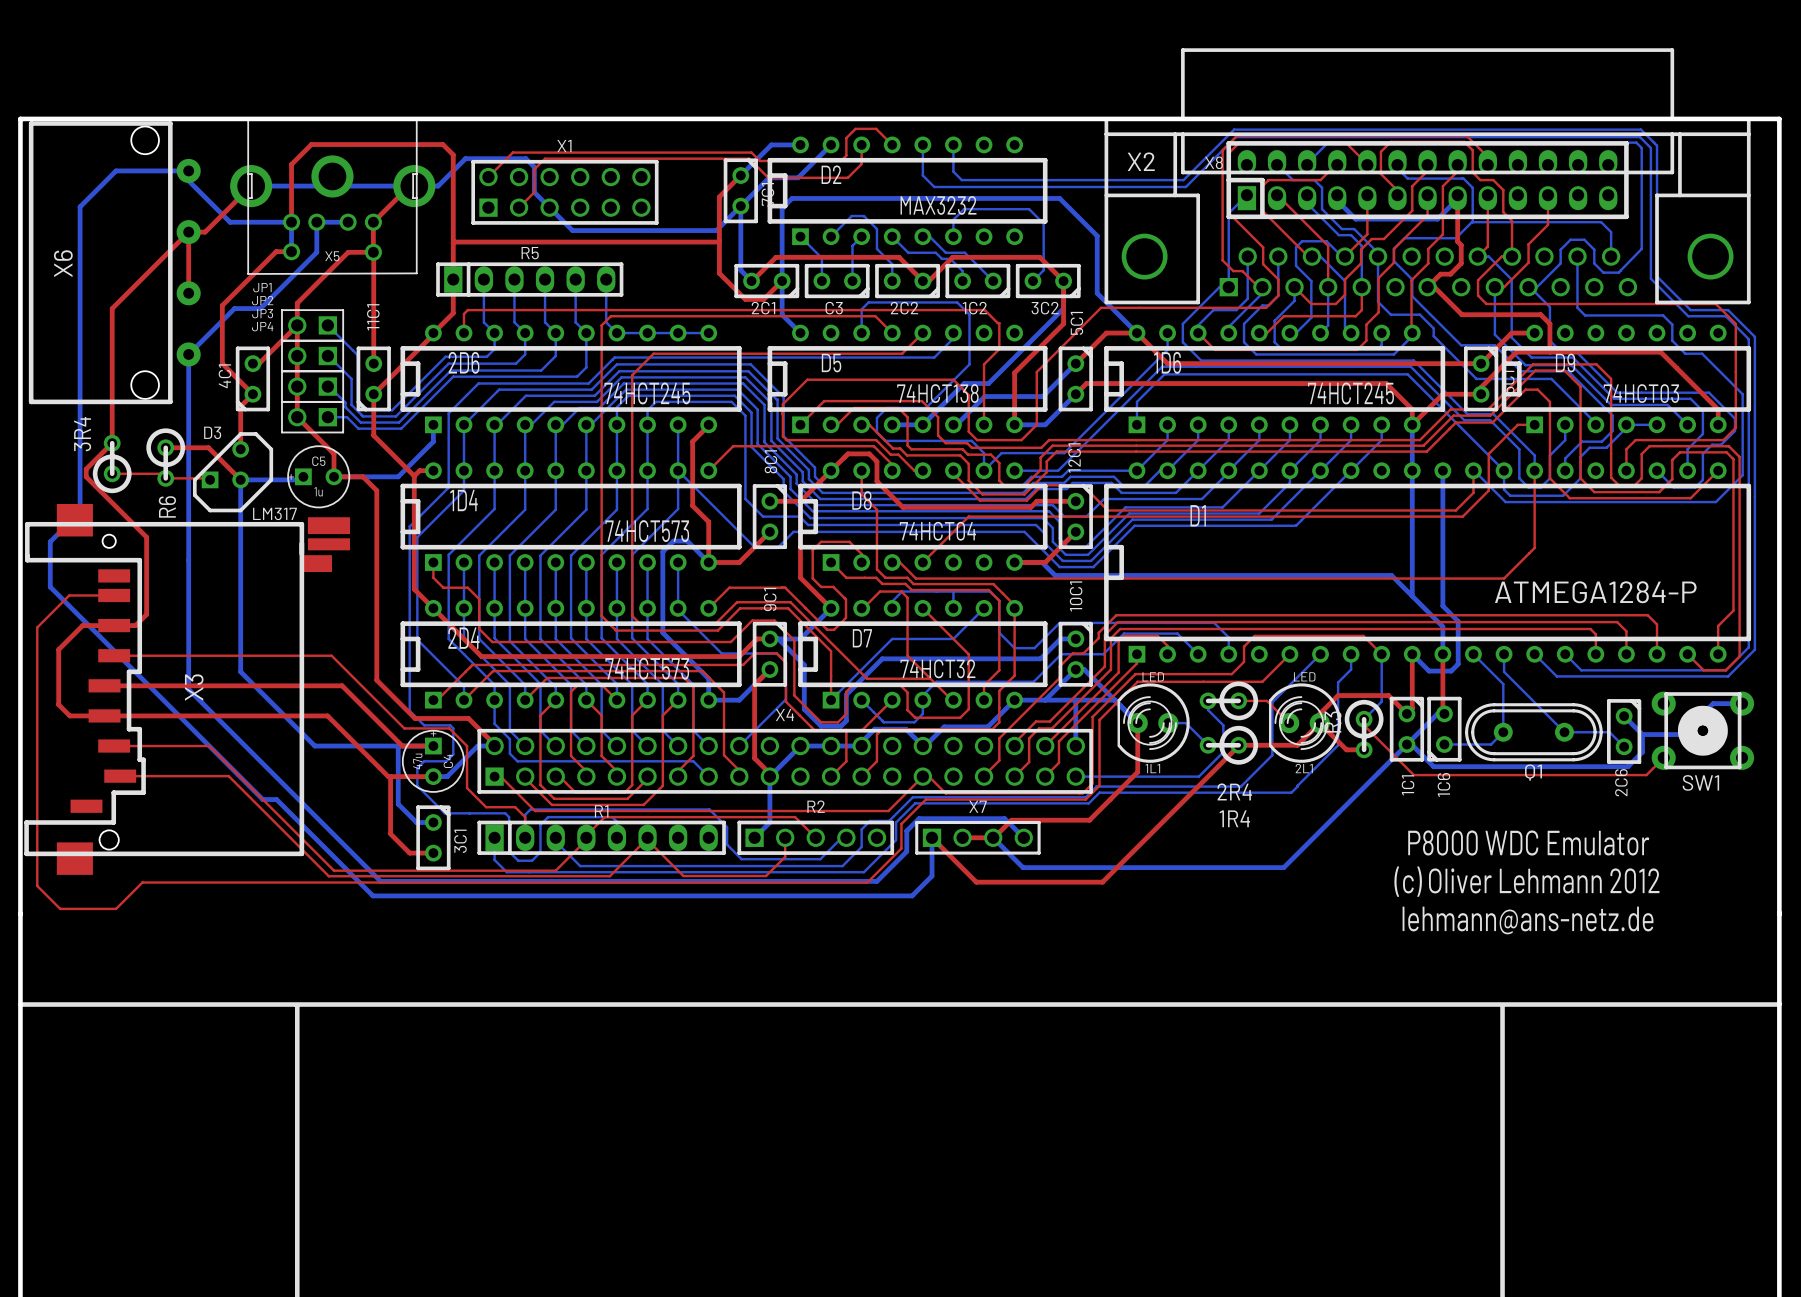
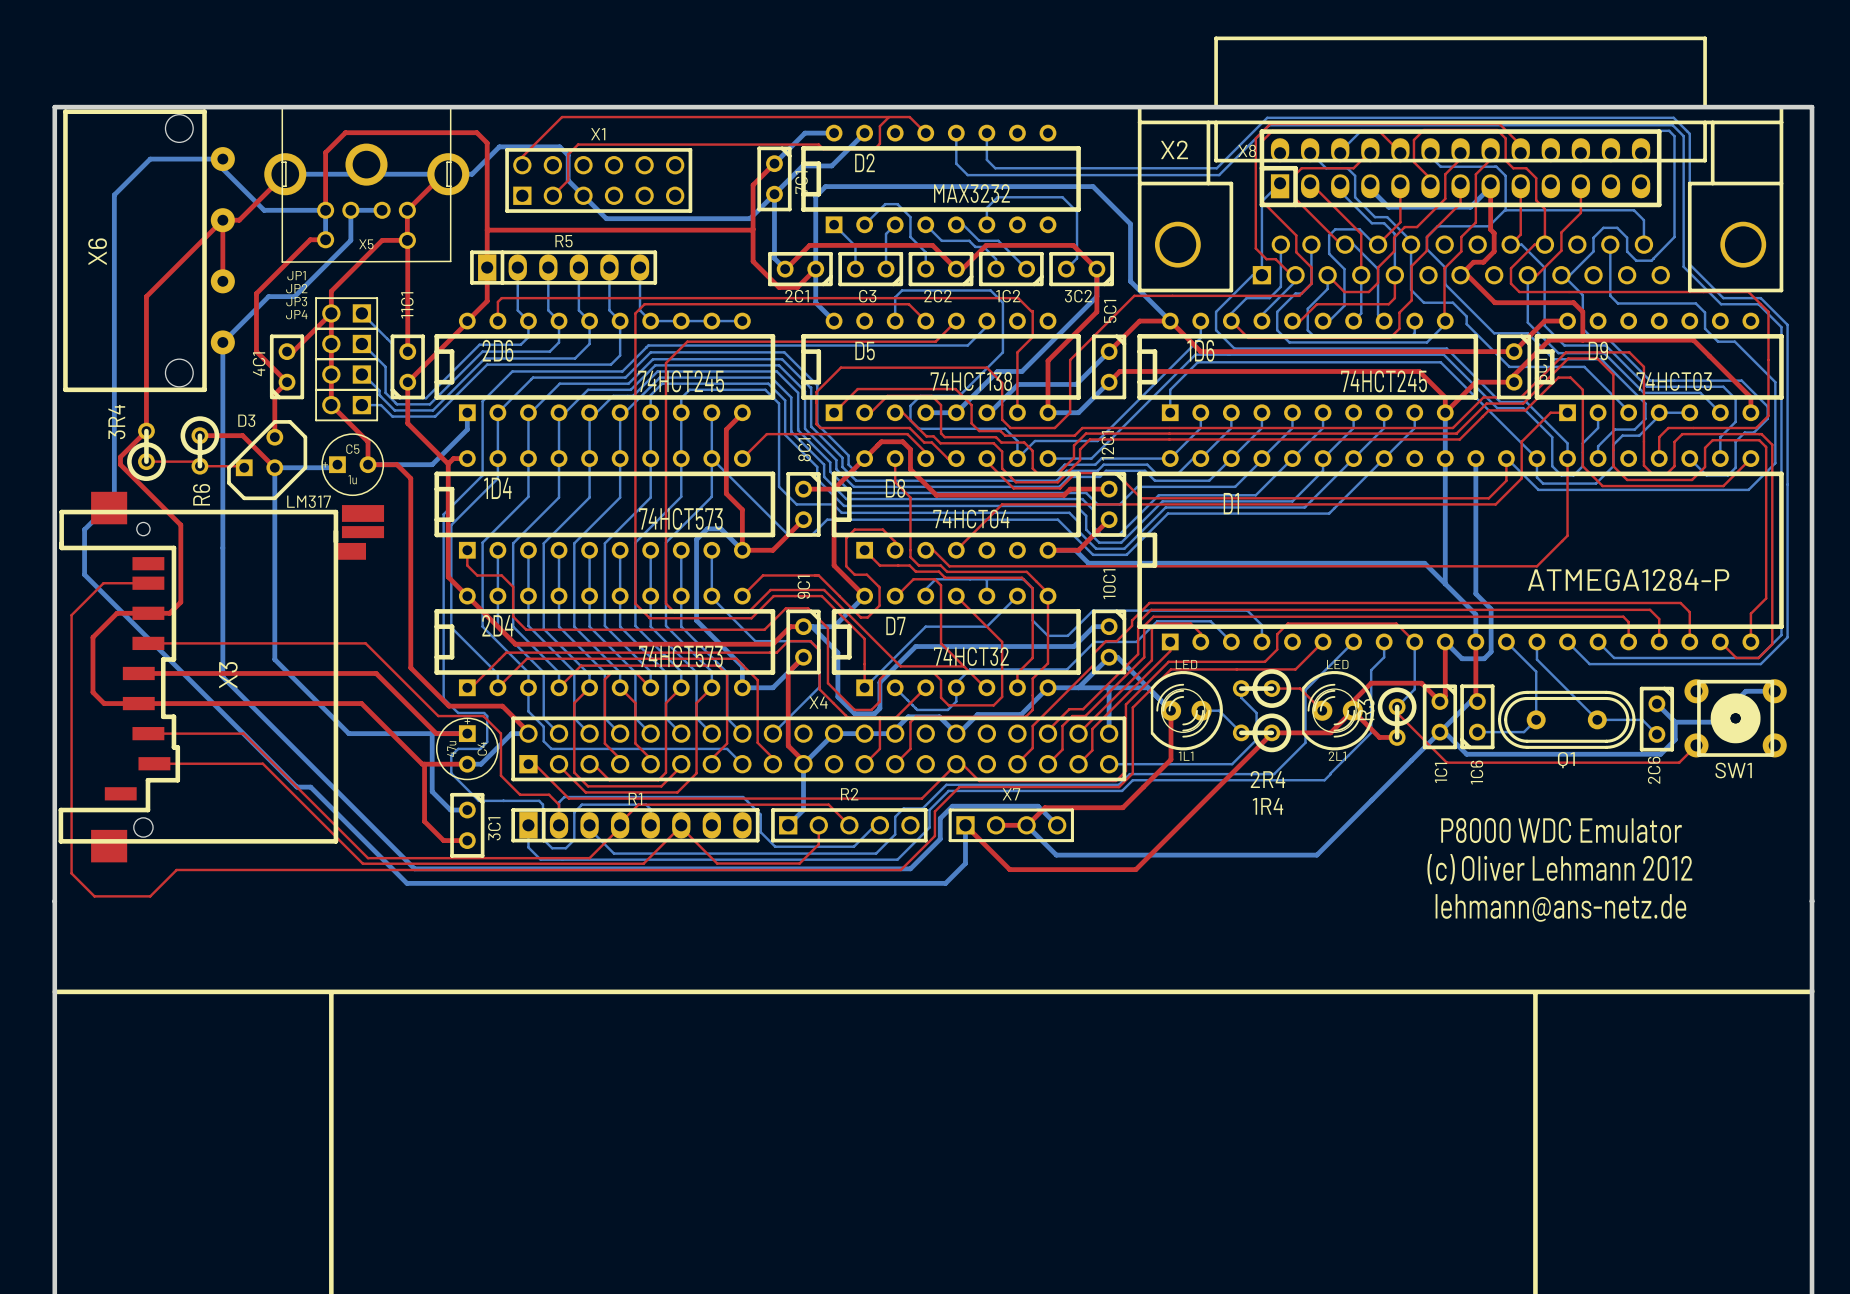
top track: none -> (889, 117) (562, 117) (522, 156) (522, 165)
top track: (861, 144) (861, 164) (847, 177) (768, 177) (749, 158) (545, 158) (534, 169) -> none
top track: (789, 160) (759, 160) (751, 152) (512, 152) (488, 177) -> (823, 149) (818, 144) (578, 144) (568, 154) (568, 157)

